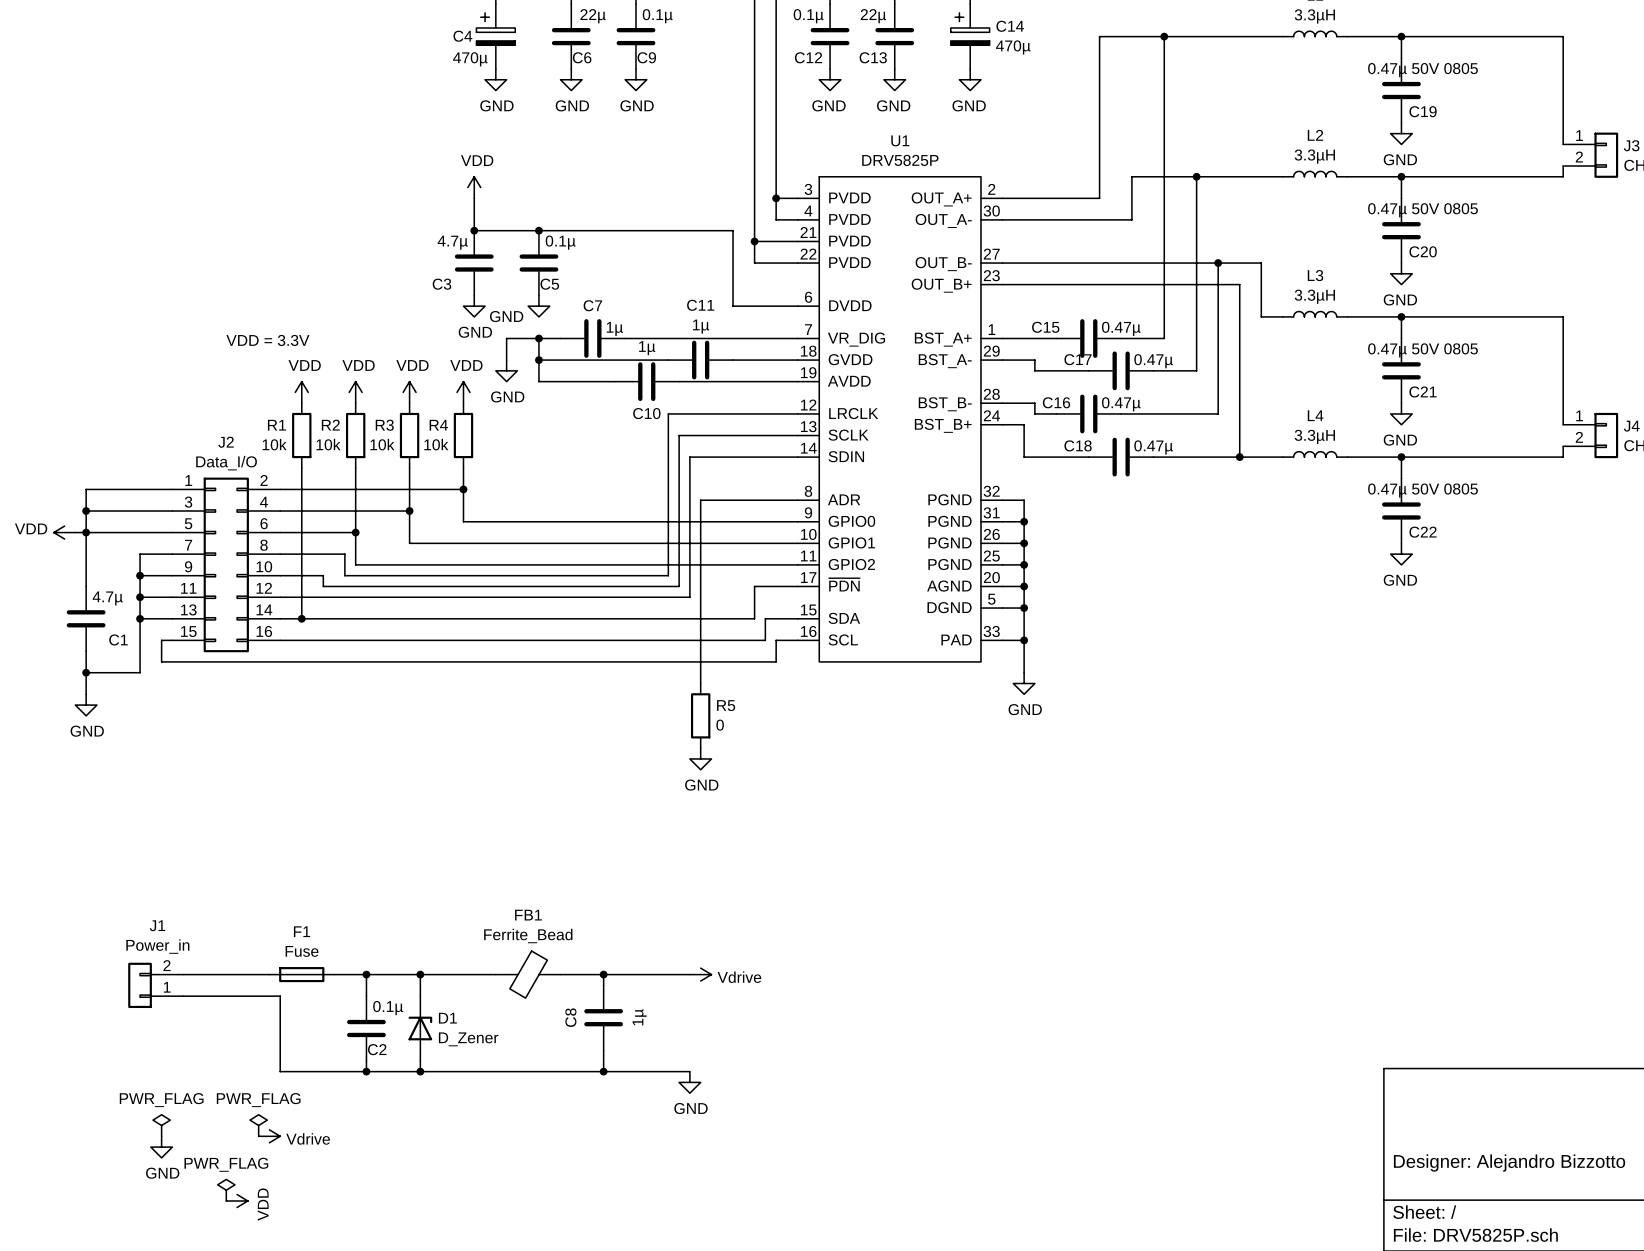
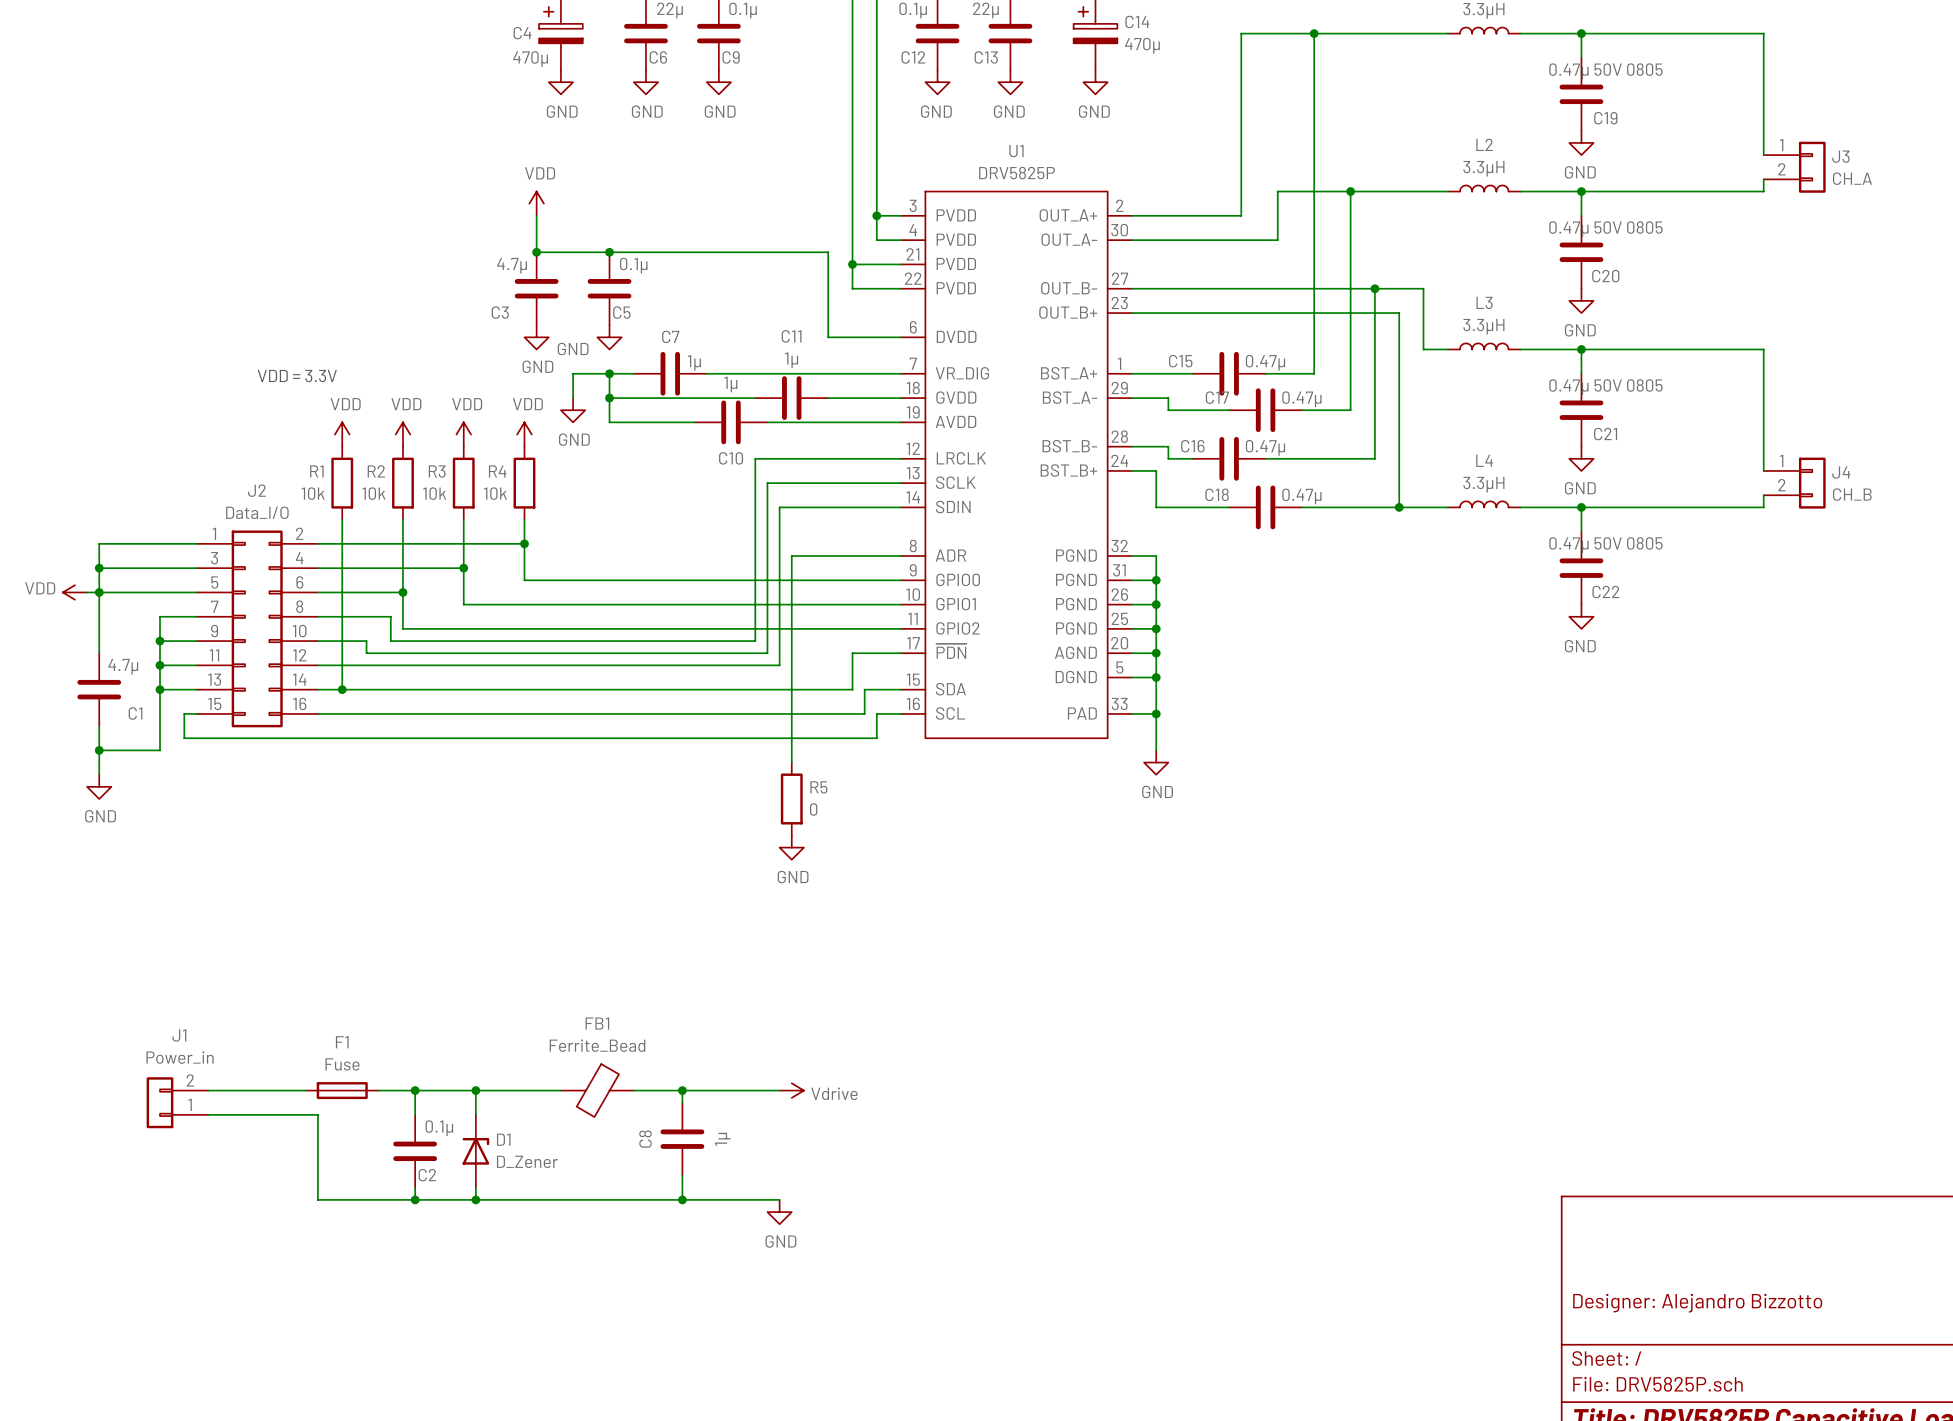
power symbol: PWR_FLAG (161, 1125) -> none
power symbol: PWR_FLAG (258, 1125) -> none
power symbol: Vdrive (269, 1136) -> none
power symbol: GND (161, 1147) -> none
power symbol: PWR_FLAG (226, 1190) -> none
power symbol: VDD (237, 1201) -> none

